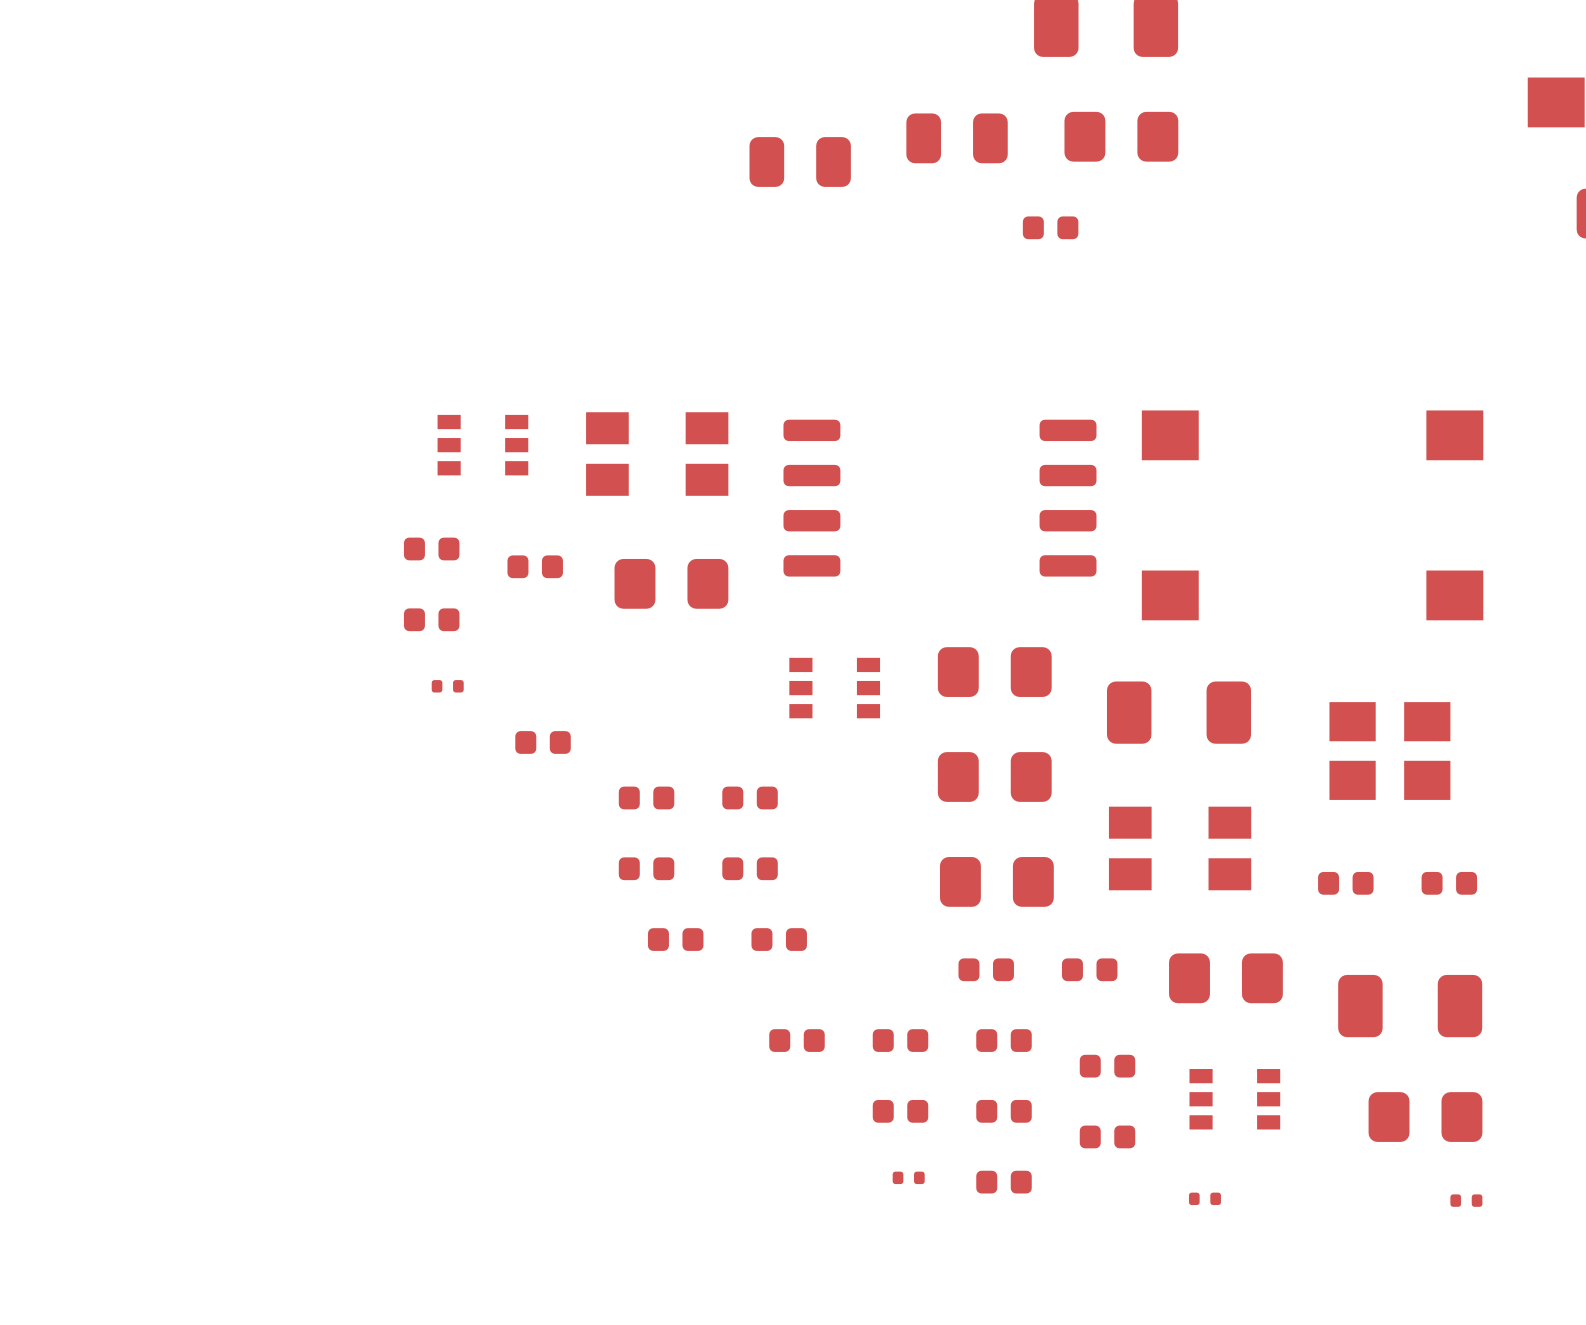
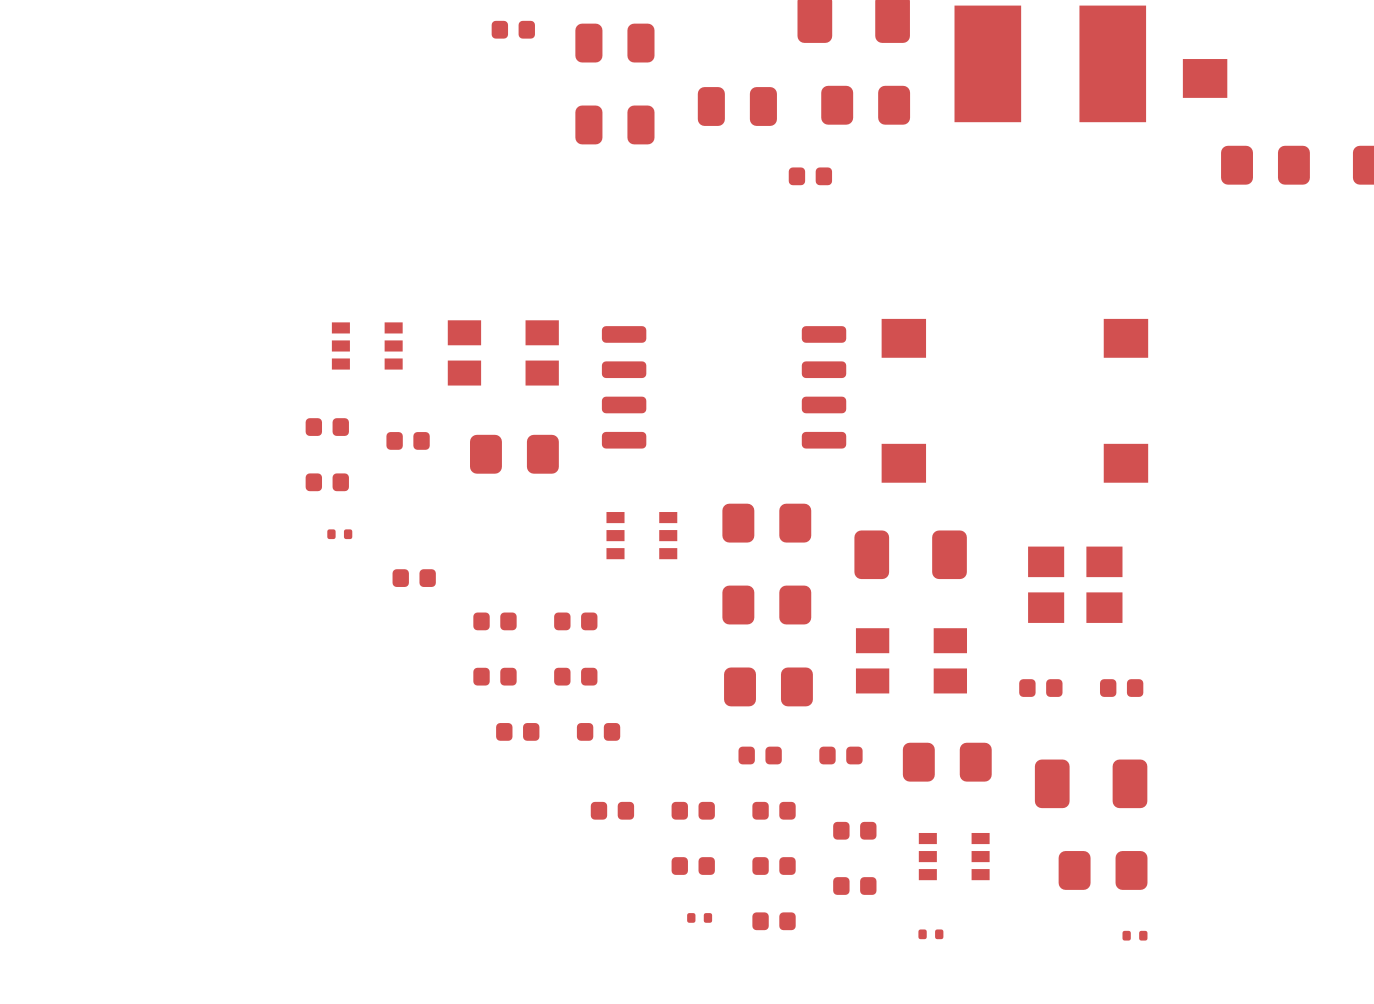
part: none -> (513, 29)
part: none -> (614, 43)
part: none -> (1050, 63)

